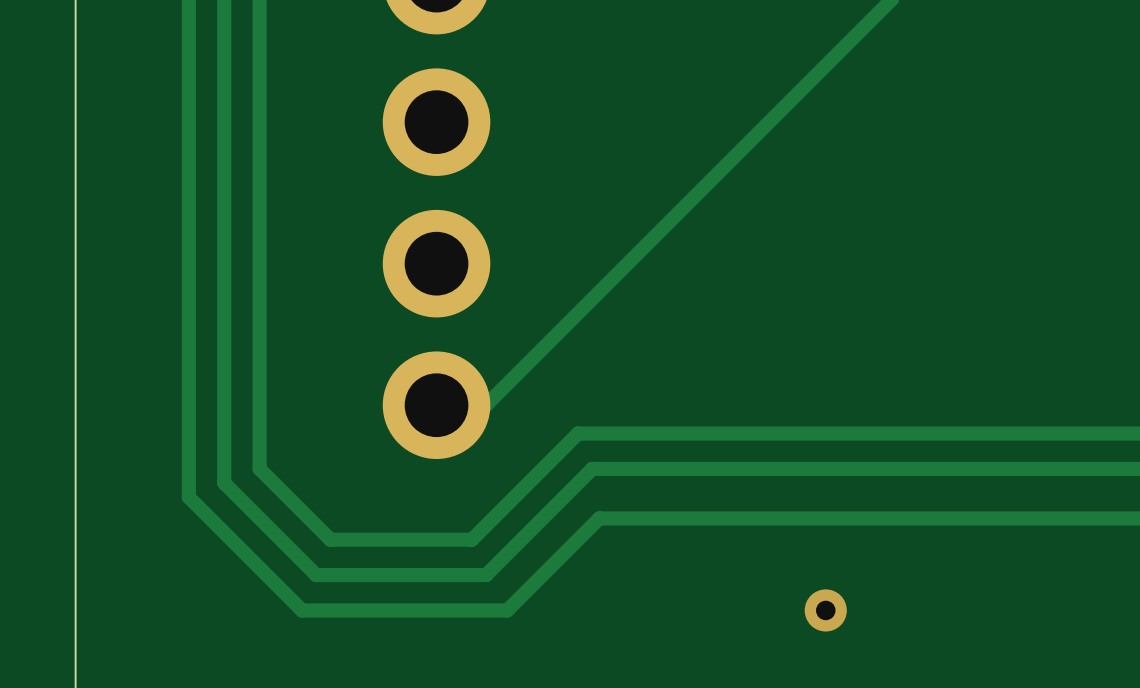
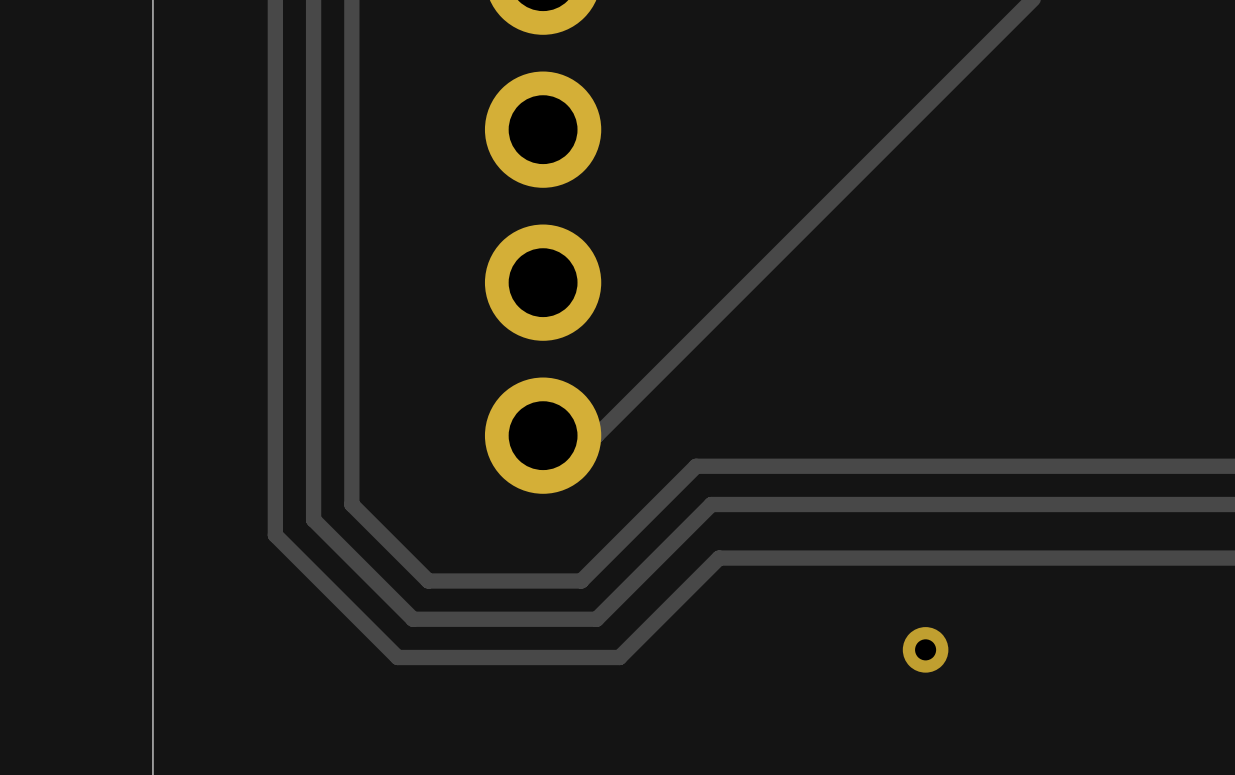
via position: (825, 610) -> (925, 649)

